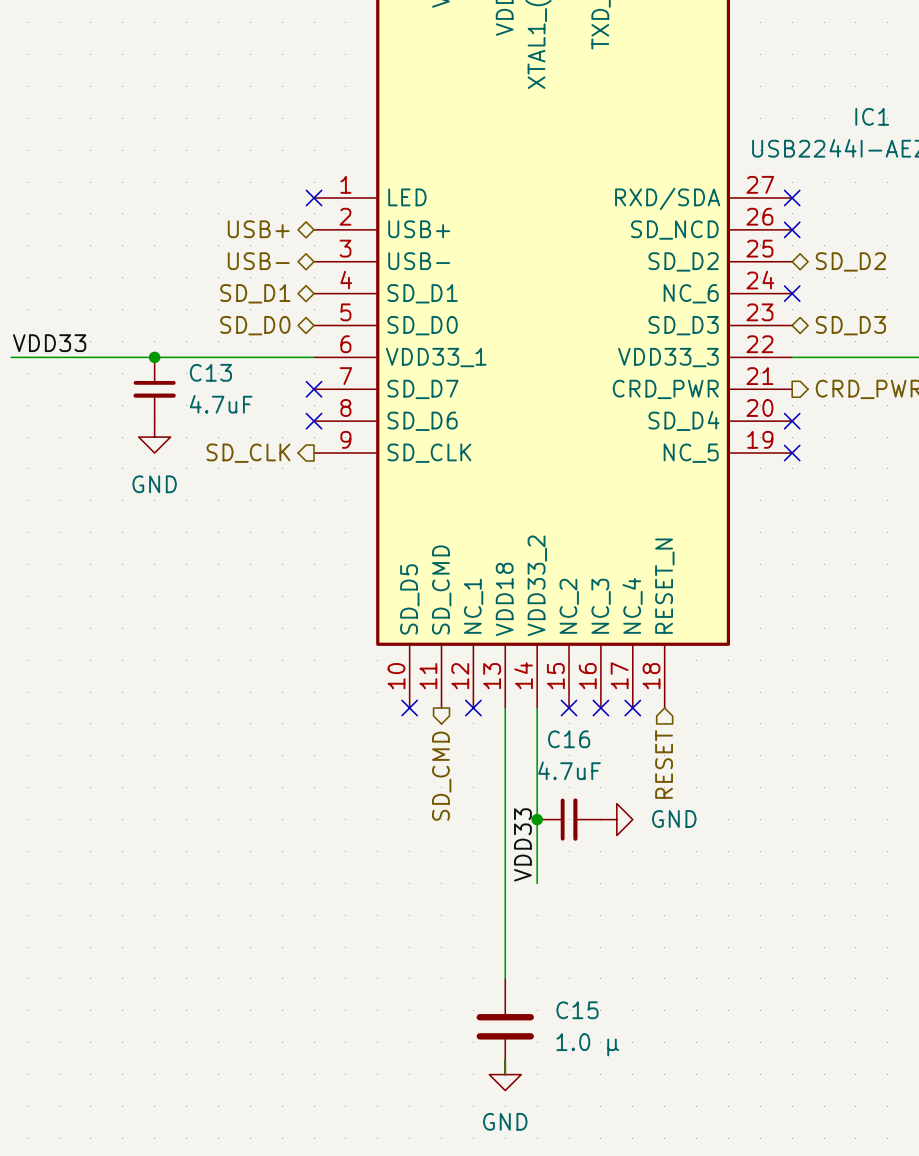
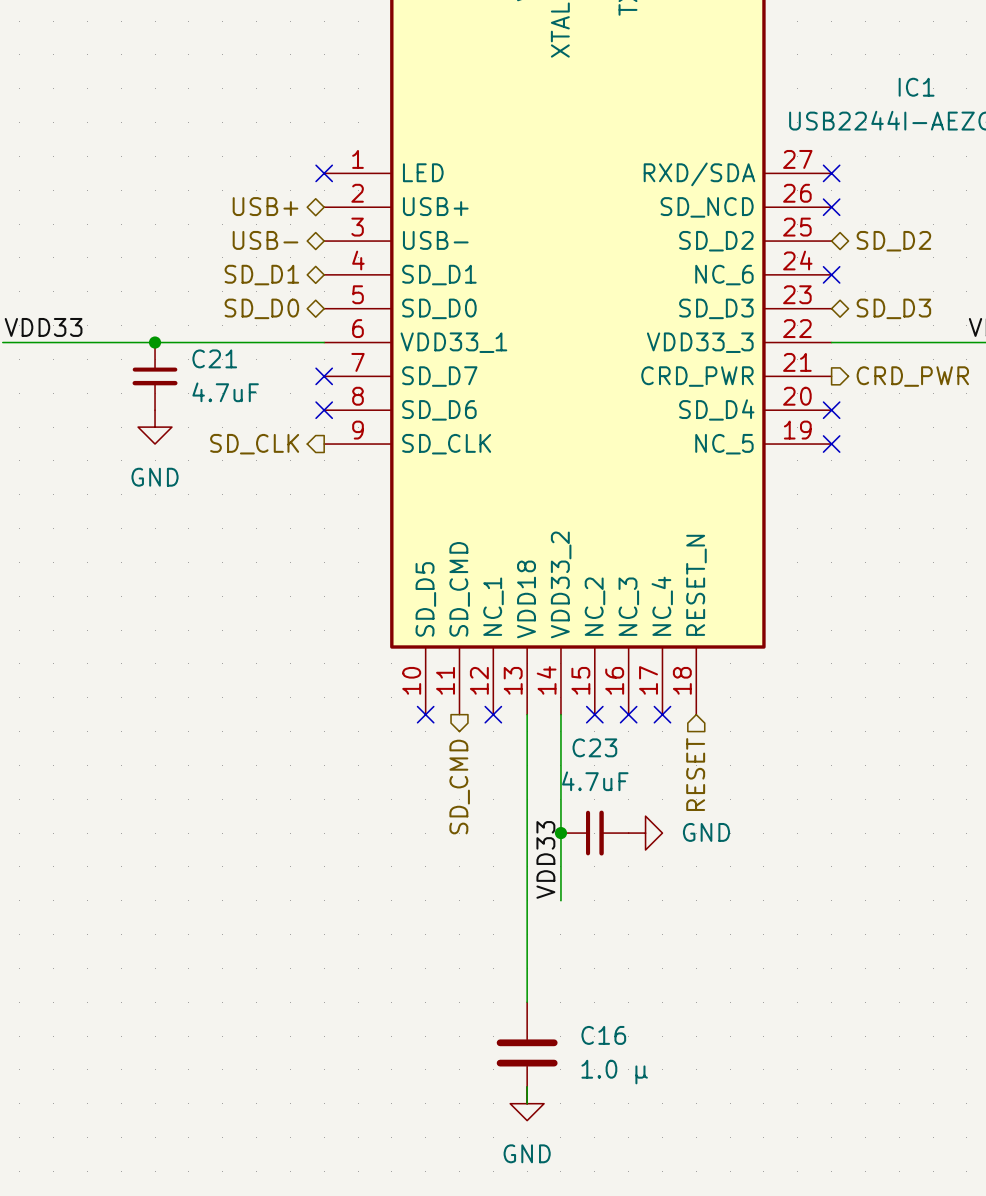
C13 name: C13 (210, 372) -> C21 (214, 358)
C16 name: C16 (569, 739) -> C23 (594, 747)
C15 name: C15 (577, 1010) -> C16 (603, 1035)

